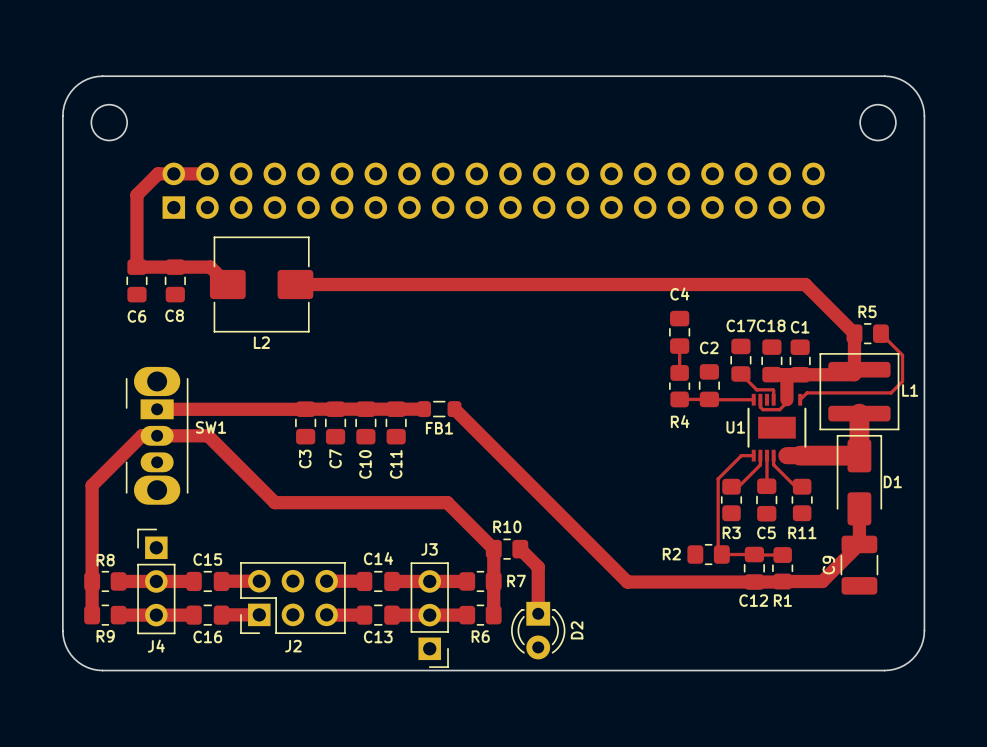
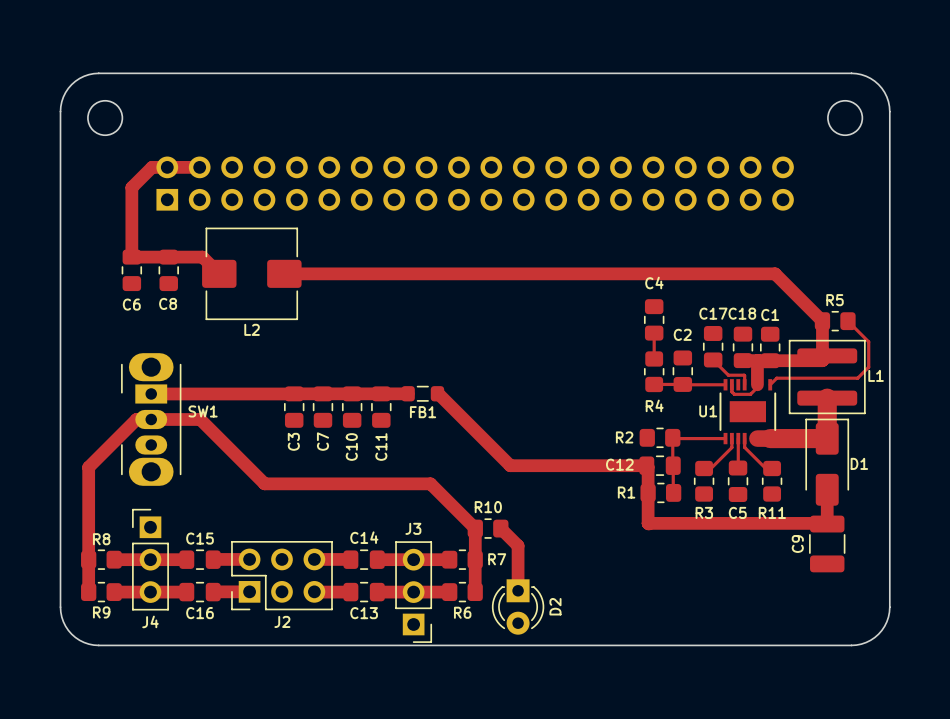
track: (454, 409) (627, 582) (822, 581) (859, 544) -> (437, 393) (510, 465) (646, 465) (648, 523)
track: (741, 455) (718, 478) (718, 550) (721, 554) (782, 555) -> (713, 438) (672, 437) (673, 492)
track: none -> (648, 523) (827, 524)
R2 position: (708, 554) -> (660, 437)
C12 rotation: 0° (754, 568) -> 90° clockwise (660, 465)
C12 position: (754, 568) -> (660, 465)
R1 rotation: 0° (782, 568) -> 90° clockwise (660, 492)
R1 position: (782, 568) -> (660, 492)

